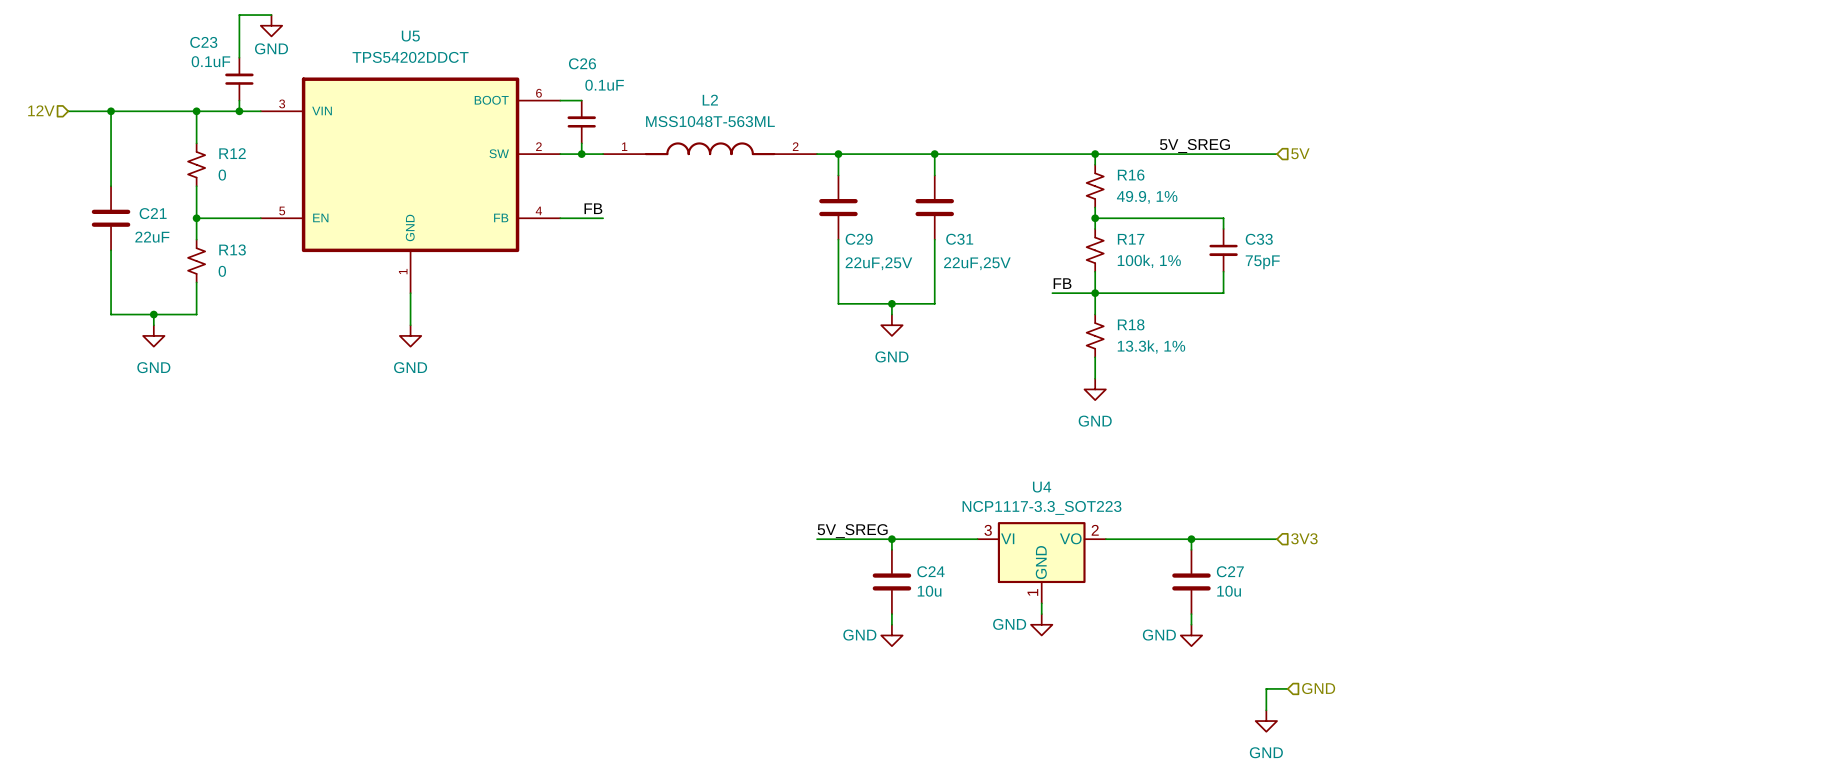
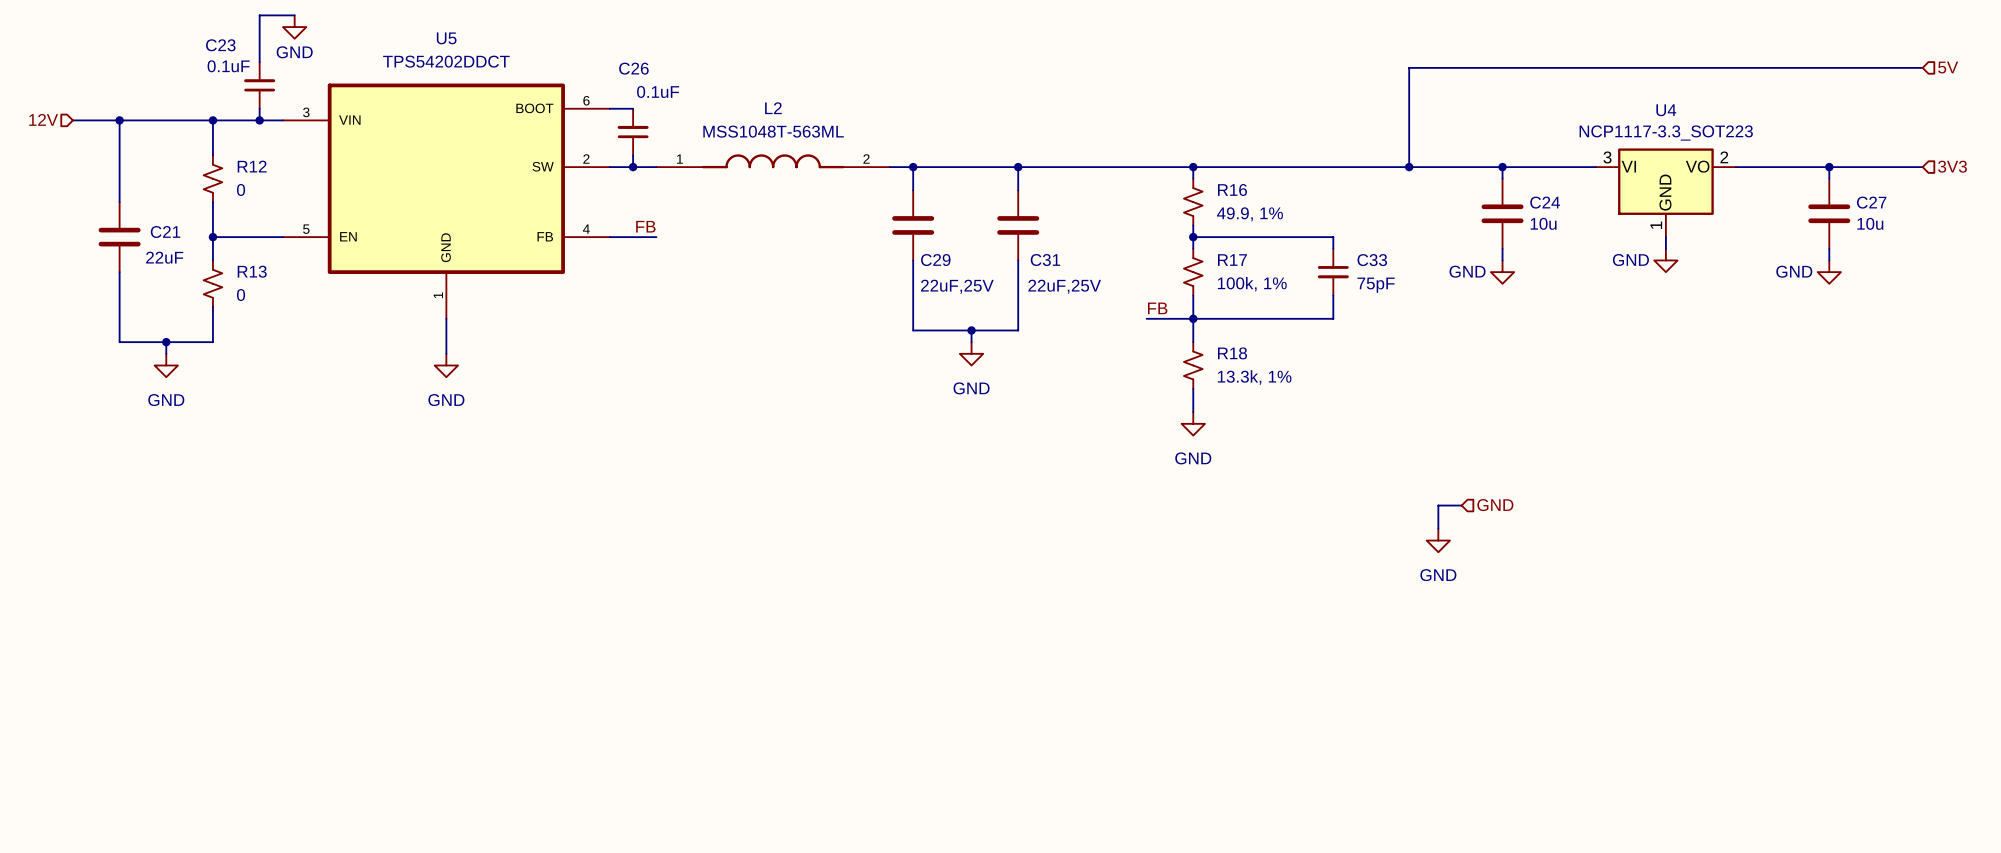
hierarchical label: none -> 5V (1948, 67)
wire: none -> (1922, 67) (1409, 67) (1409, 167)
label: 5V_SREG (1194, 146) -> none
hierarchical label: 5V (1300, 153) -> none
hierarchical label: none -> 3V3 (1952, 166)
wire: none -> (1391, 167) (1595, 167)
junction: none -> (1409, 167)
wire: none -> (1502, 167) (1502, 178)
junction: none -> (1502, 167)
wire: none -> (1735, 167) (1922, 167)
wire: none -> (1829, 167) (1829, 178)
junction: none -> (1829, 167)
wire: none -> (1665, 237) (1665, 248)
wire: none -> (1502, 248) (1502, 260)
wire: none -> (1829, 248) (1829, 260)
power symbol: none -> GND (1665, 260)
power symbol: none -> GND (1502, 272)
power symbol: none -> GND (1829, 272)
hierarchical label: none -> GND (1495, 505)
wire: none -> (1461, 505) (1438, 505) (1438, 528)
power symbol: none -> GND (1438, 540)
label: 5V_SREG (852, 531) -> none
hierarchical label: 3V3 (1304, 538) -> none
wire: (817, 539) (977, 539) -> none
wire: (891, 539) (891, 549) -> none
junction: (891, 539) -> none
wire: (1105, 539) (1277, 539) -> none
wire: (1191, 539) (1191, 549) -> none
junction: (1191, 539) -> none
U4 position: (1041, 562) -> (1665, 192)
C24 position: (891, 581) -> (1502, 213)
C27 position: (1191, 581) -> (1829, 213)
wire: (1041, 603) (1041, 614) -> none
wire: (891, 614) (891, 624) -> none
wire: (1191, 614) (1191, 624) -> none
power symbol: GND (1041, 624) -> none
power symbol: GND (891, 635) -> none
power symbol: GND (1191, 635) -> none
wire: (1287, 688) (1266, 688) (1266, 710) -> none
hierarchical label: GND (1318, 688) -> none
power symbol: GND (1266, 721) -> none

